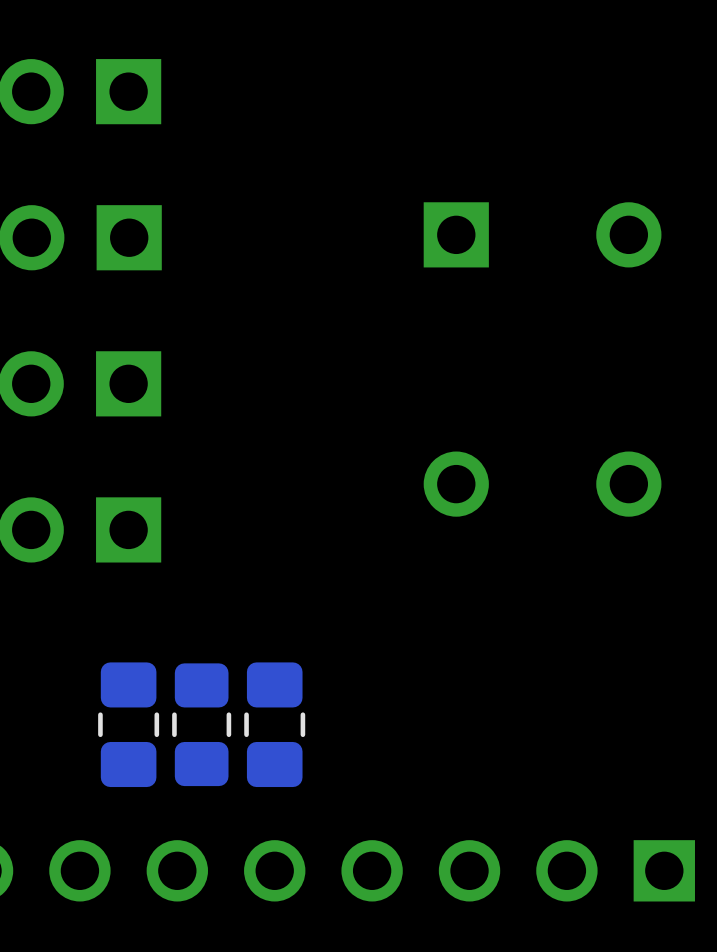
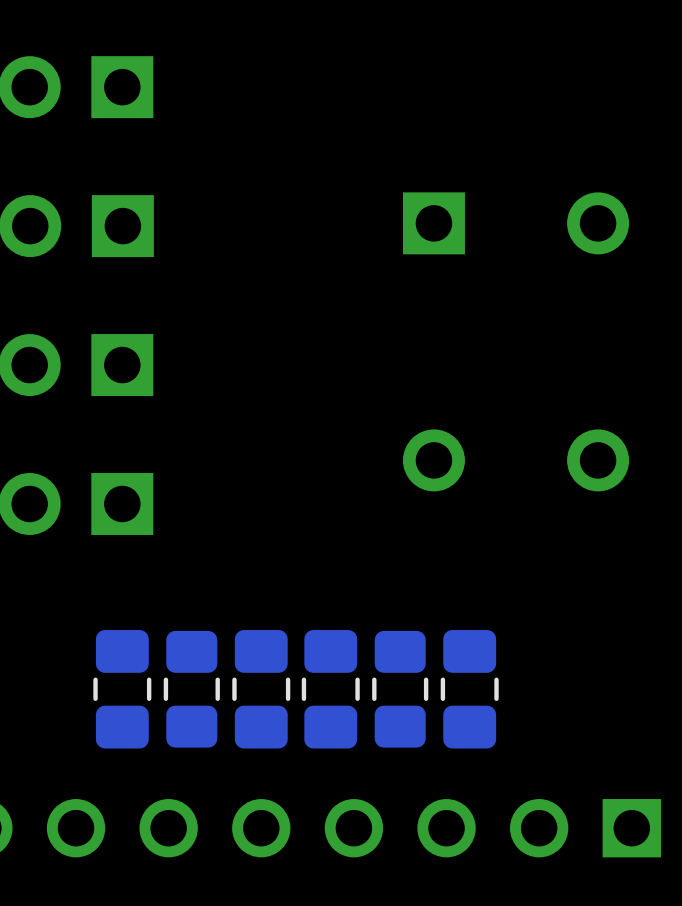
part: none -> (330, 689)
part: none -> (400, 689)
part: none -> (469, 689)

